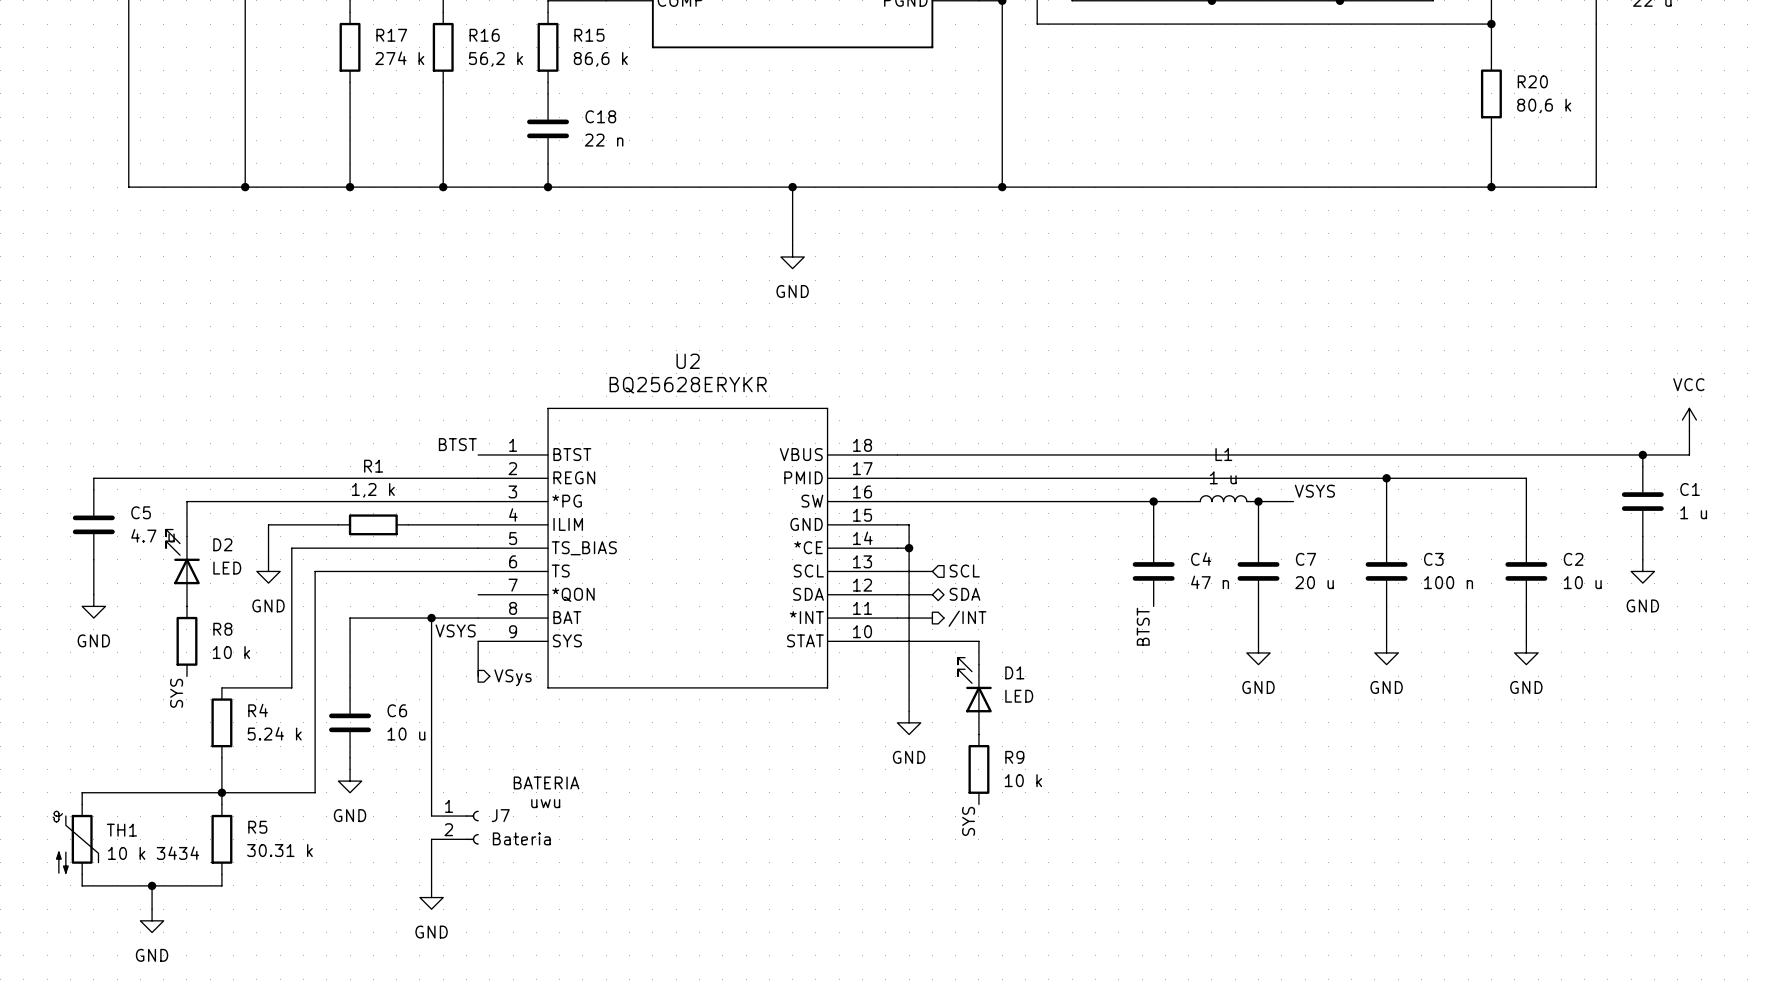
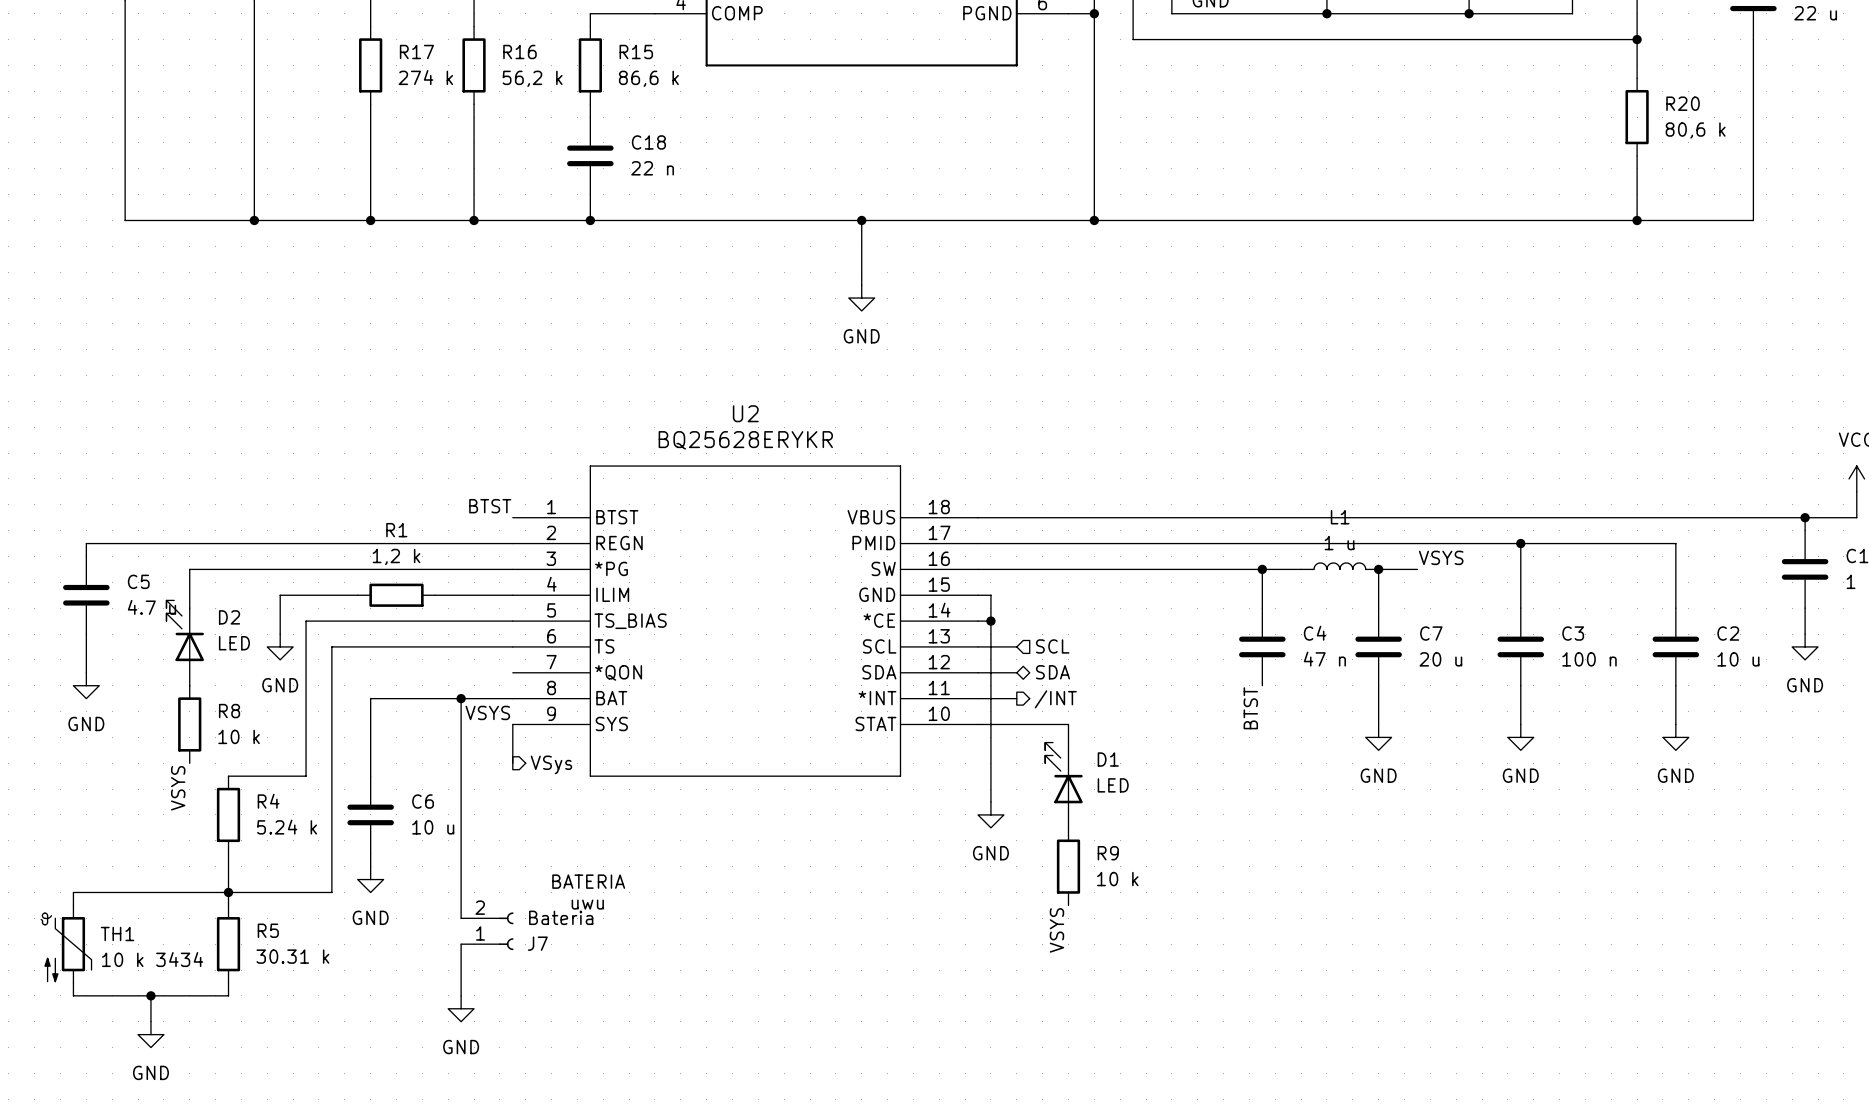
label: SYS (176, 693) -> VSYS (178, 788)
label: SYS (968, 821) -> VSYS (1056, 930)
J7 flip: as is (472, 827) -> up-down (506, 931)

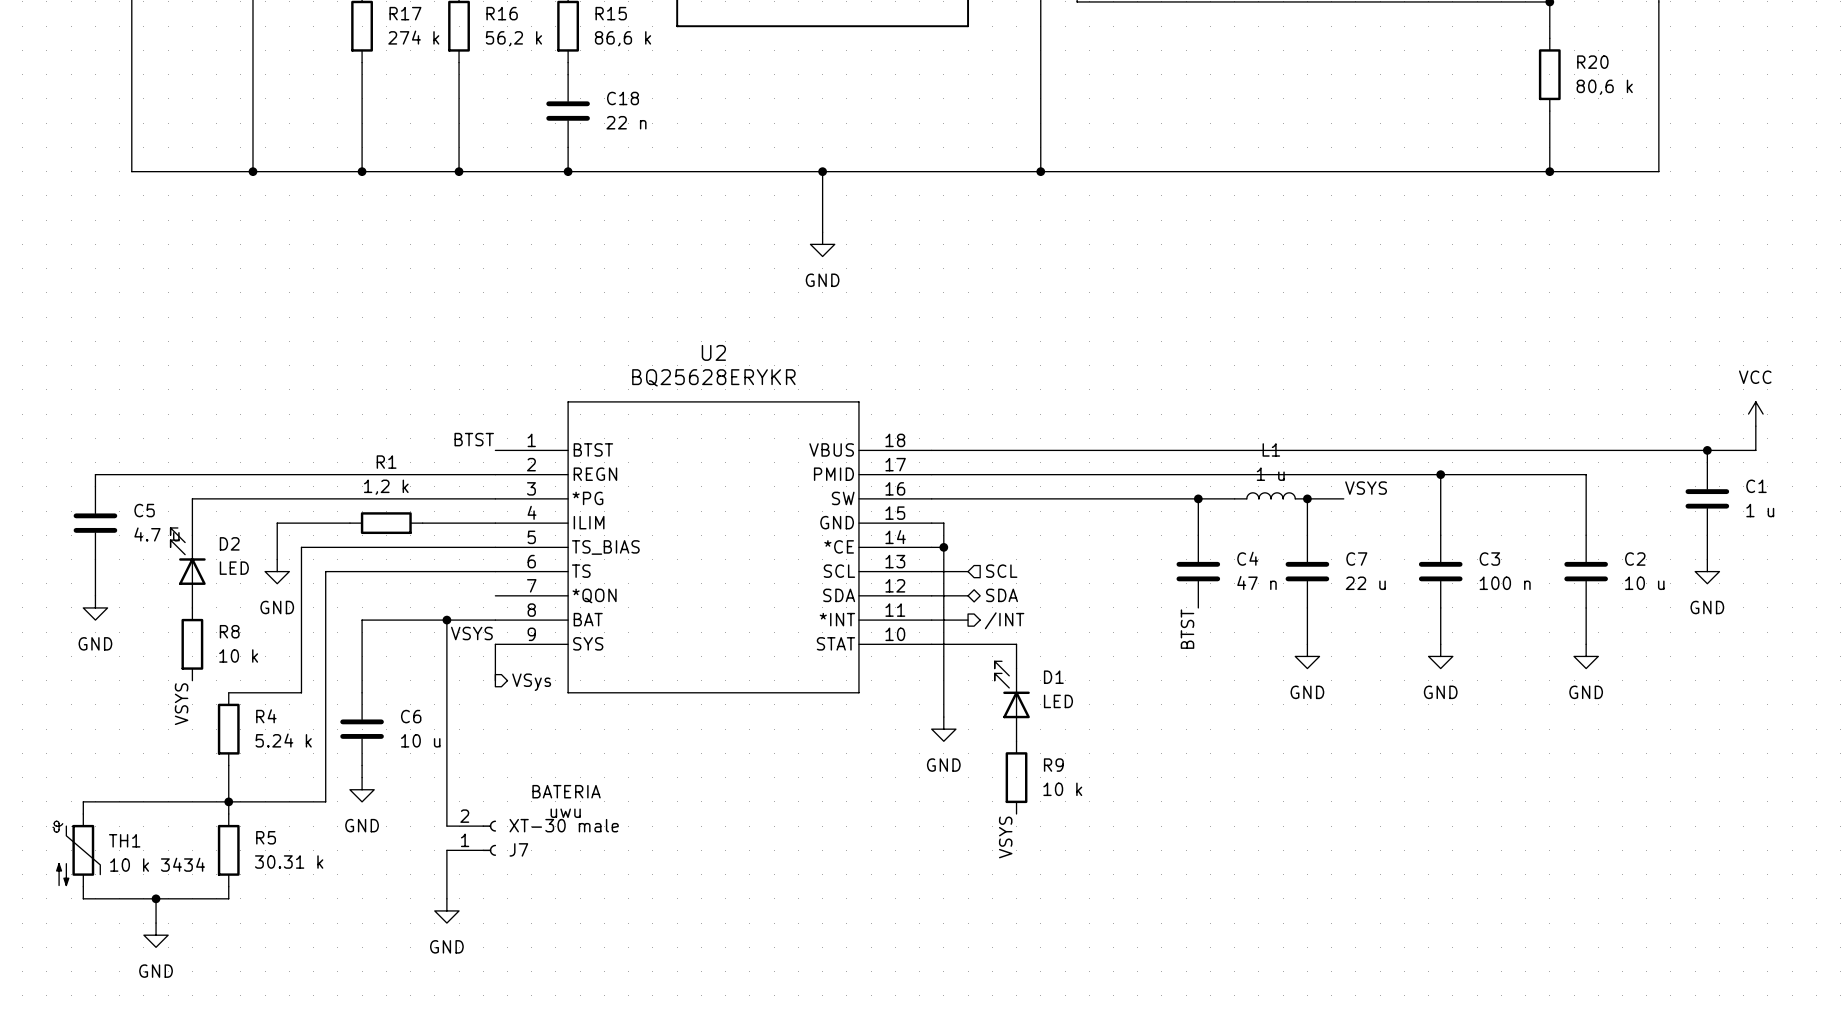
C7 value: 20 u (1440, 659) -> 22 u (1365, 583)
J7 value: Bateria (561, 917) -> XT-30 male (564, 825)

